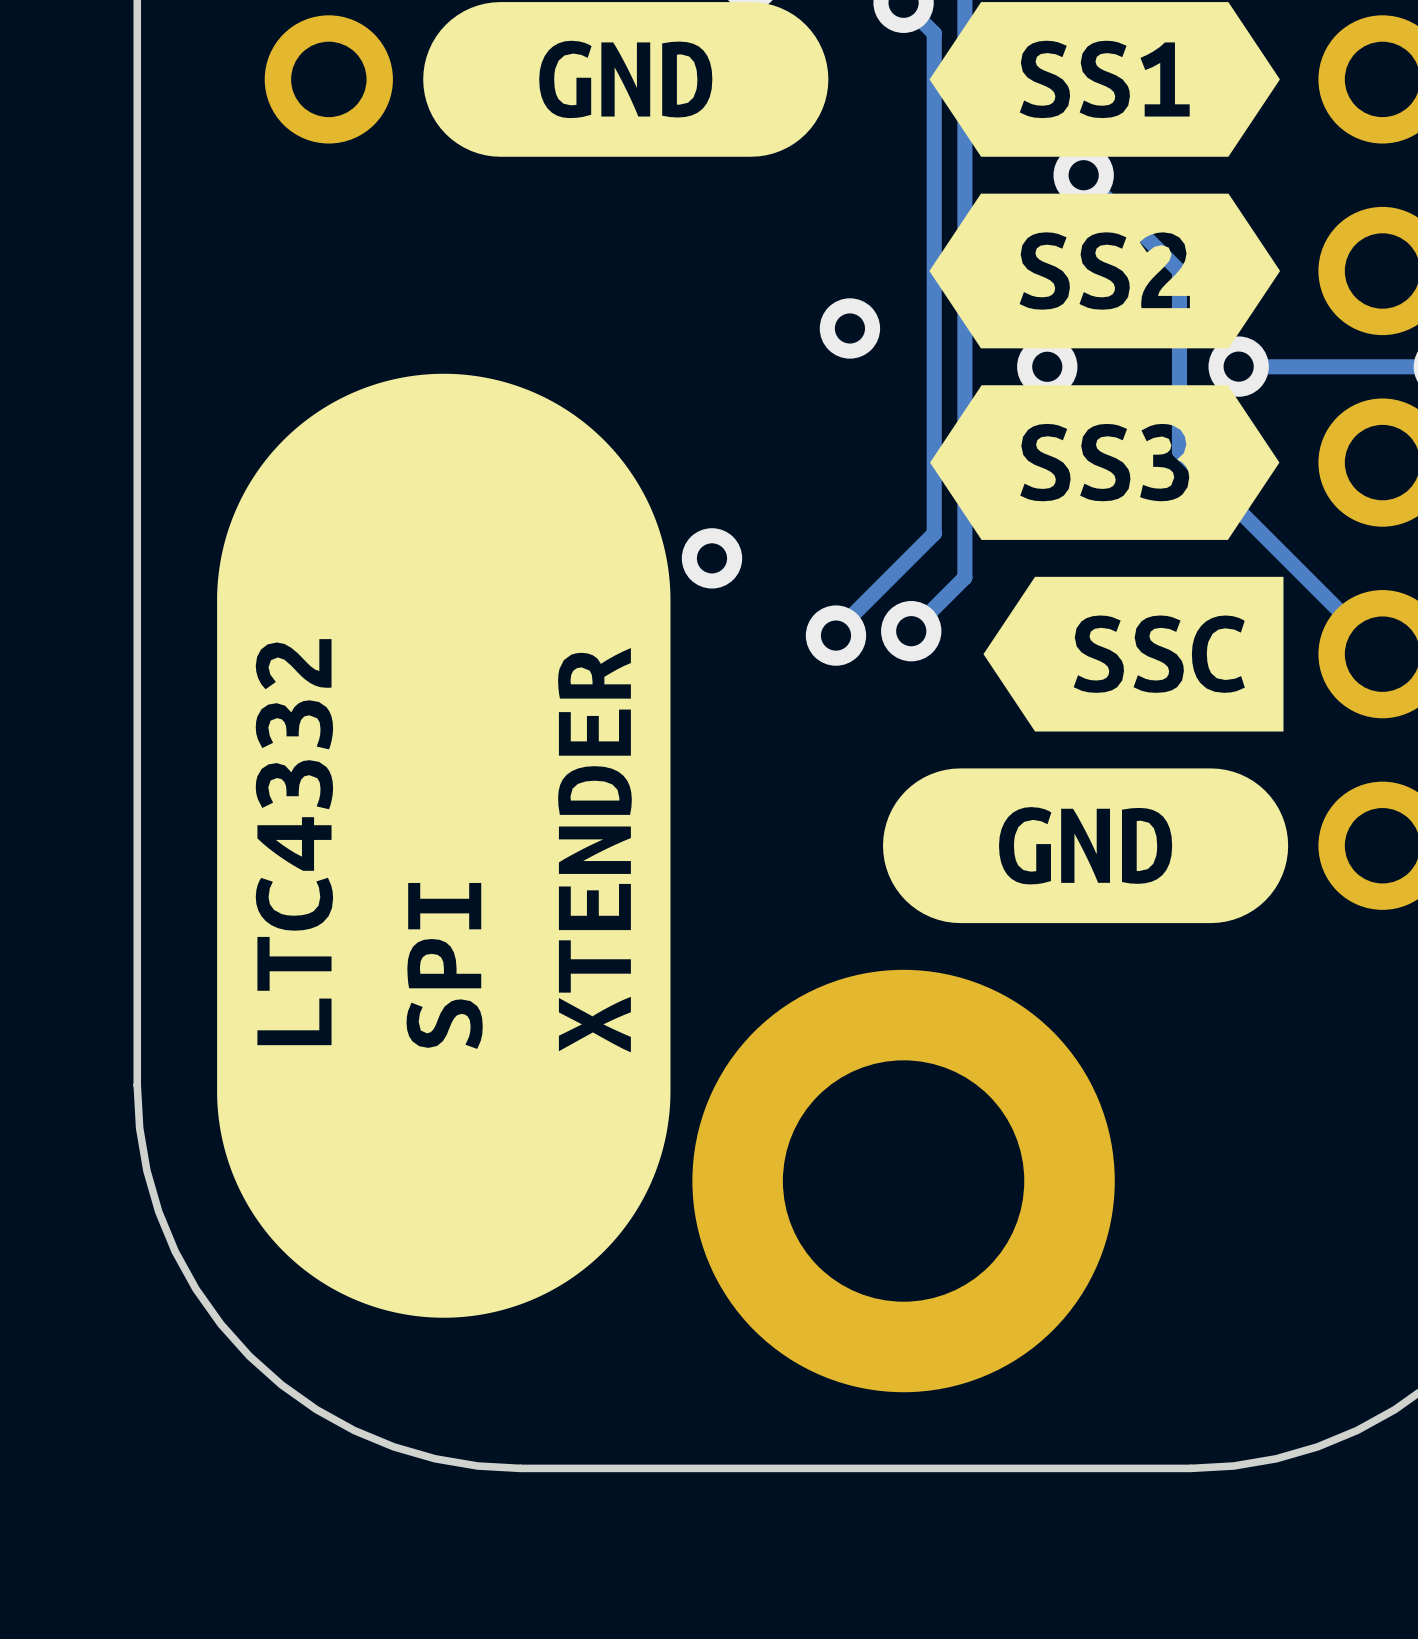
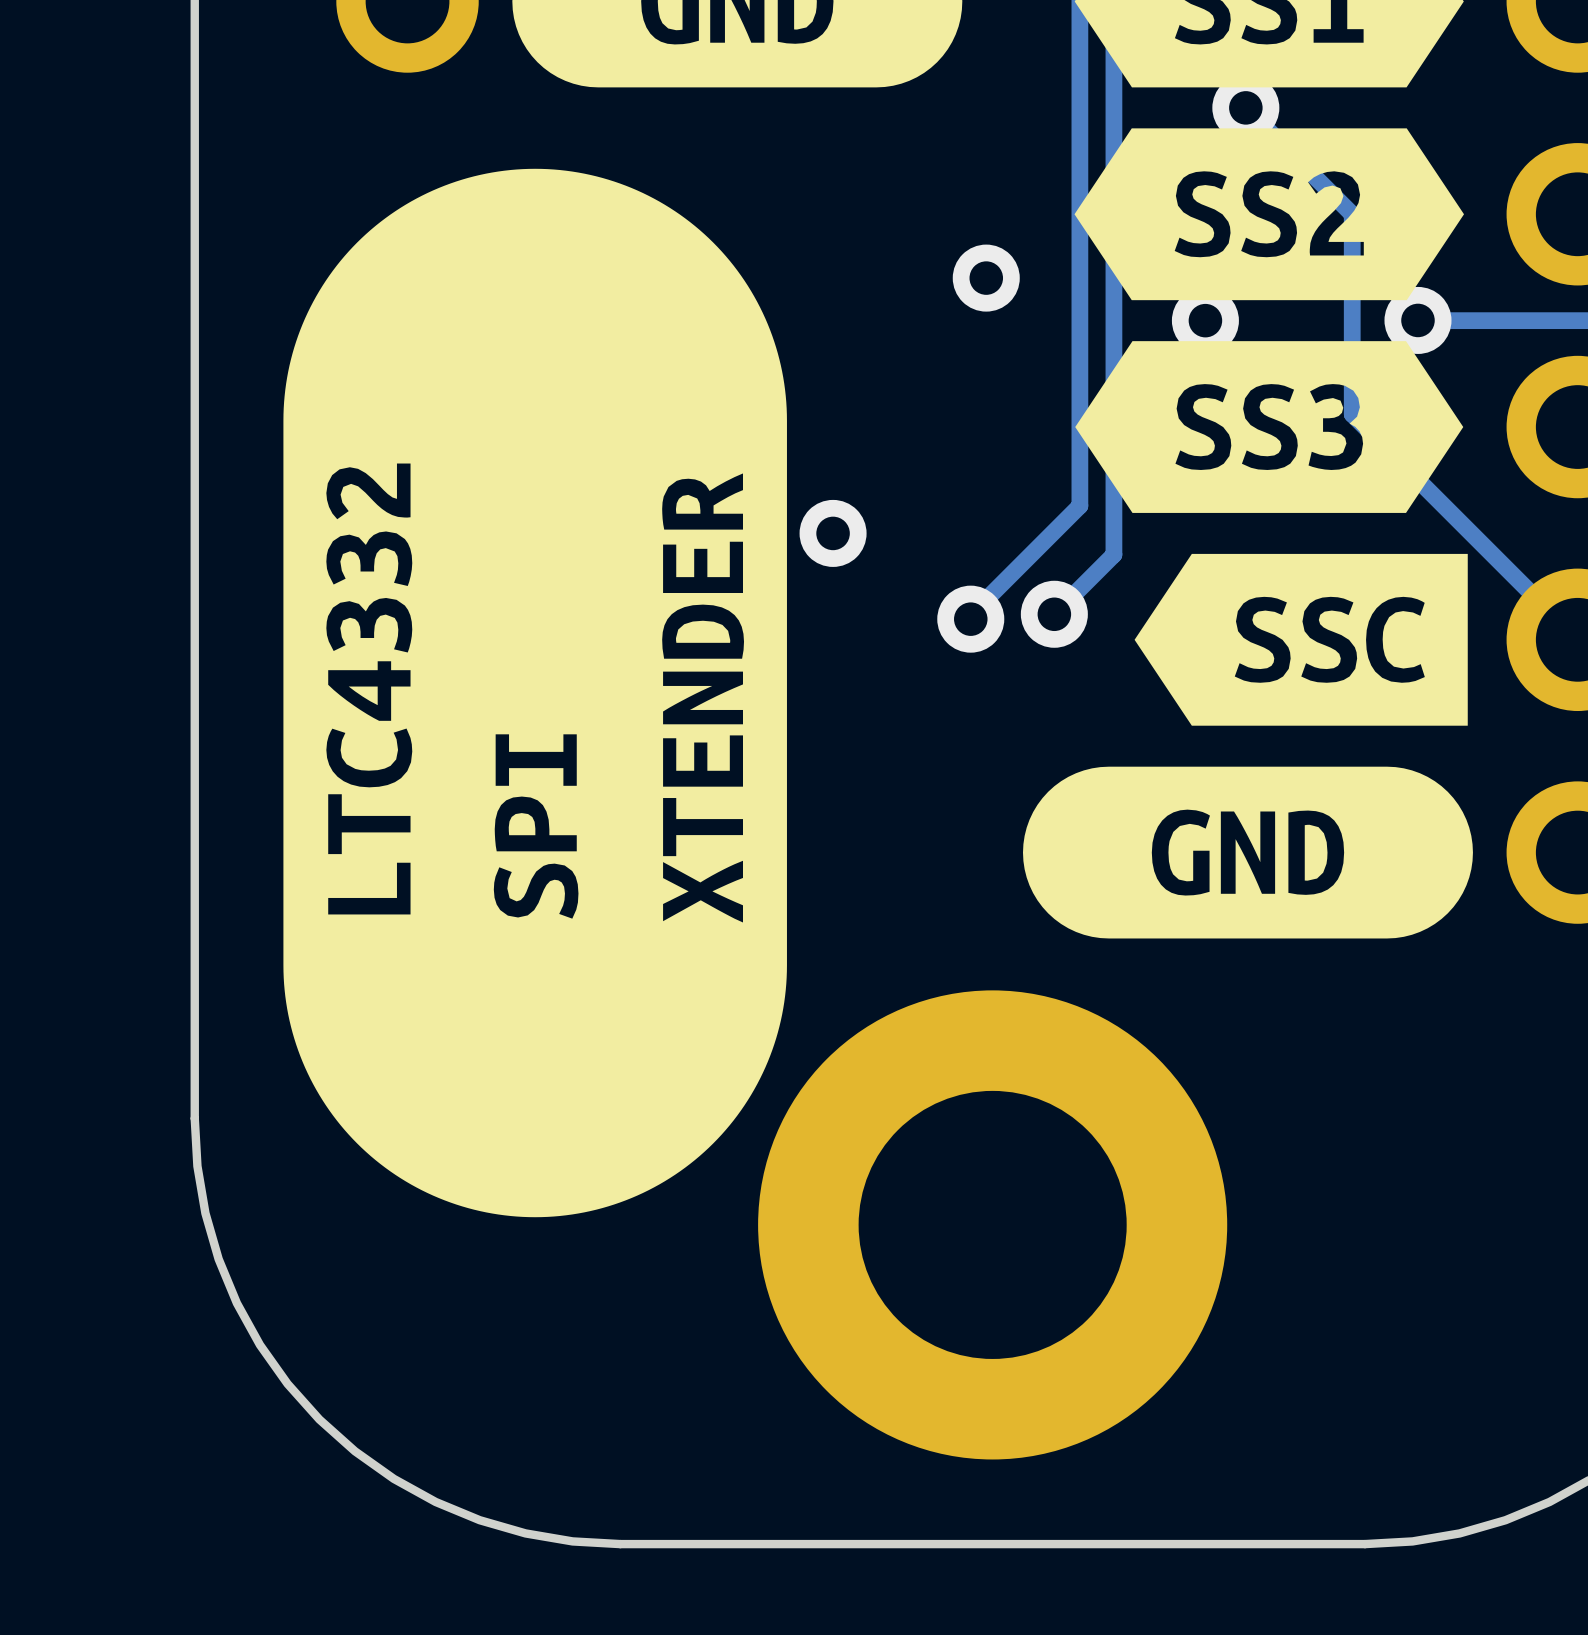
drawing position: (443, 845) -> (535, 693)
part position: (903, 1181) -> (992, 1224)

